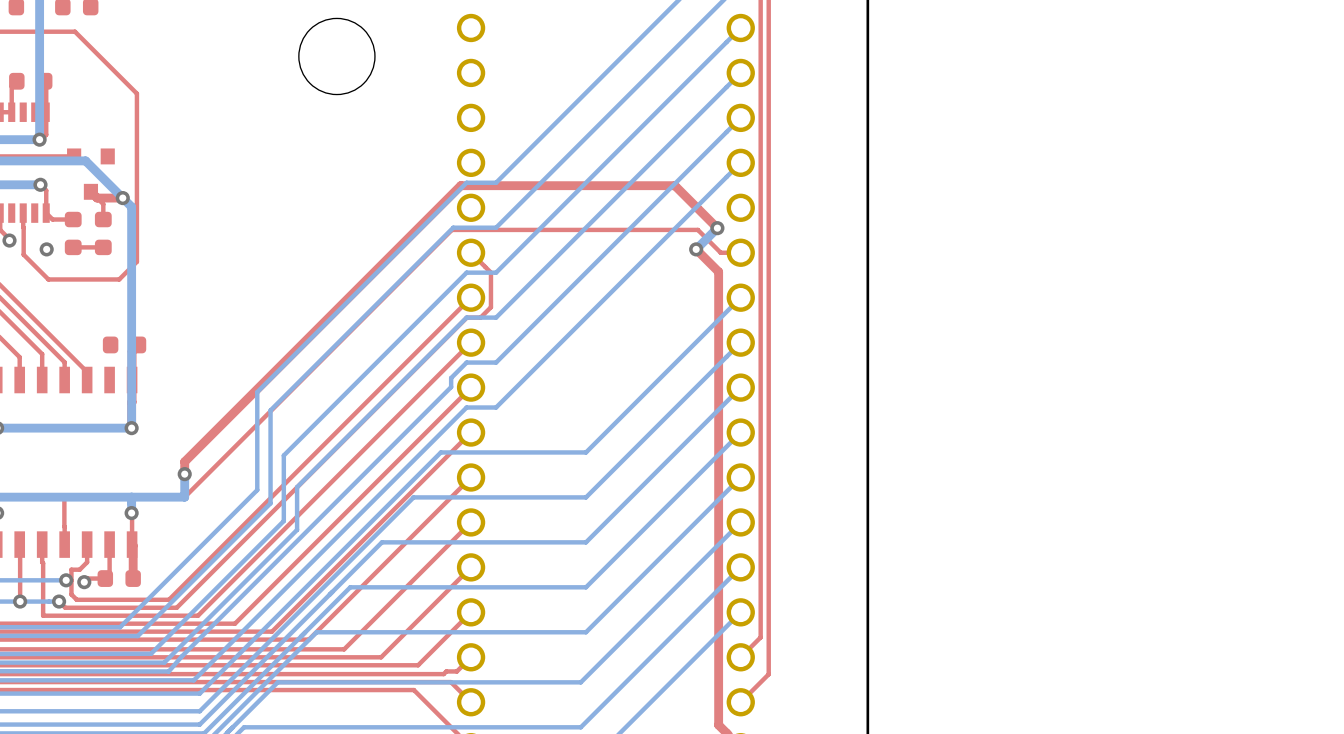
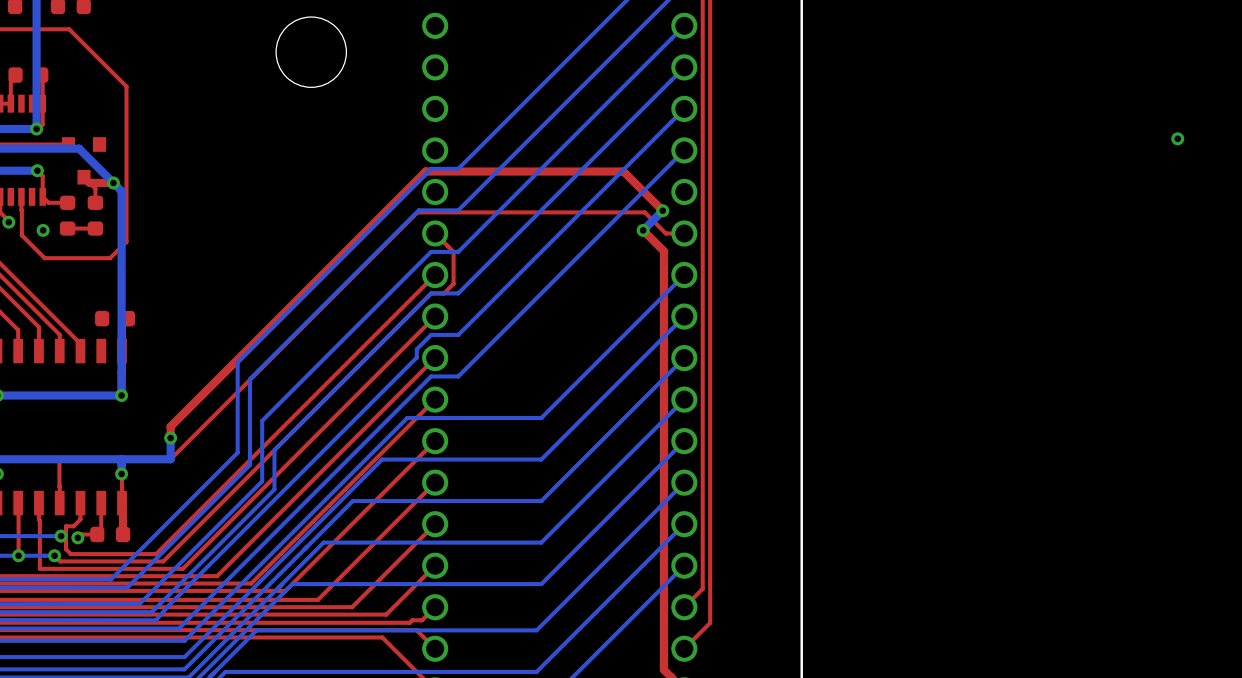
via: none -> (1177, 138)

